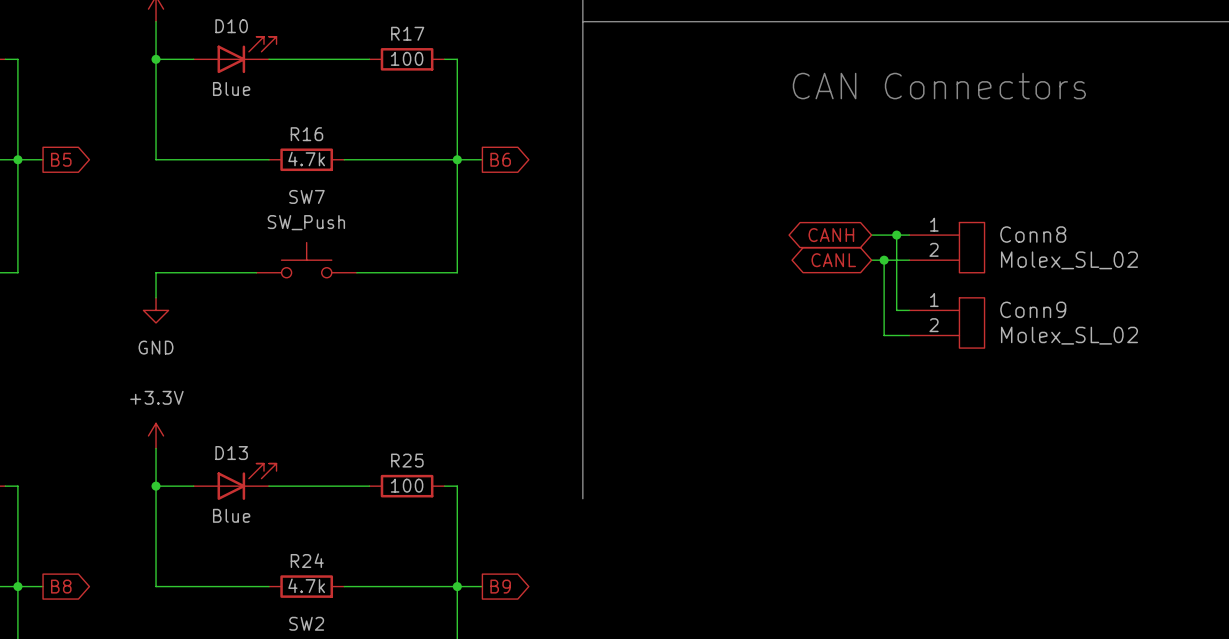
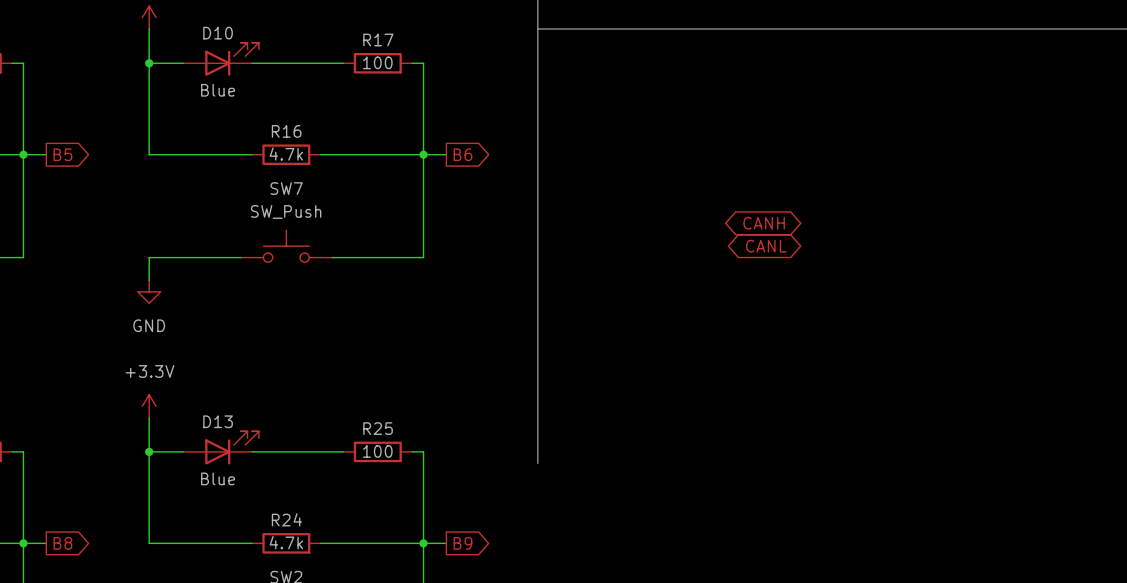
text: CAN Connectors (939, 86) -> none
wire: (871, 235) (909, 235) -> none
wire: (896, 235) (896, 310) (909, 310) -> none
junction: (896, 235) -> none
Conn8: Molex_SL_02 (946, 247) -> none
wire: (871, 260) (909, 260) -> none
wire: (884, 260) (884, 335) (909, 335) -> none
junction: (884, 260) -> none
Conn9: Molex_SL_02 (946, 322) -> none

